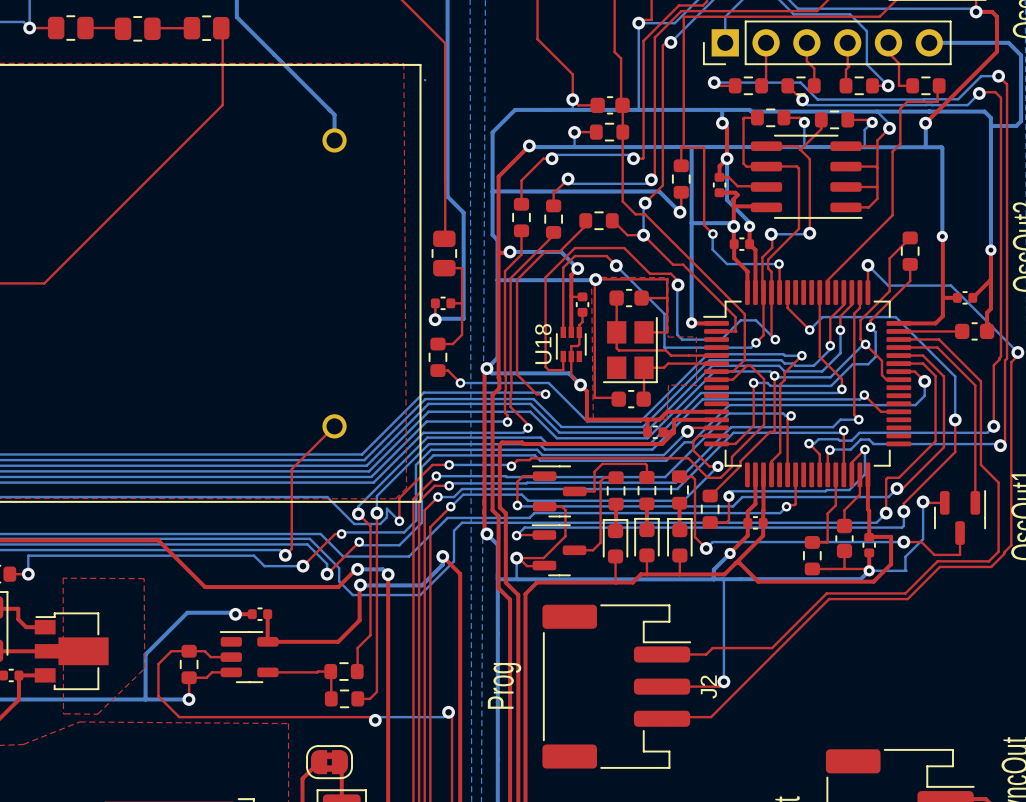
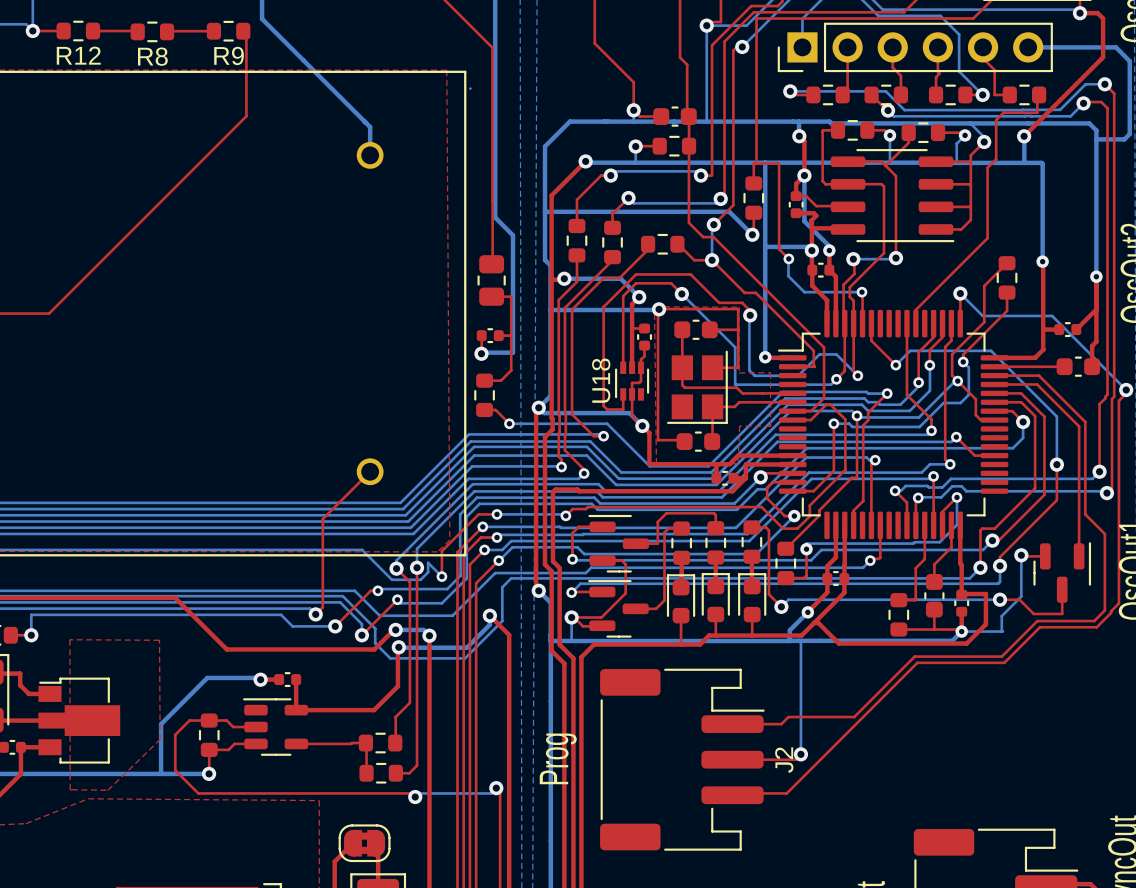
part: (70, 28) -> none
R12: none -> (78, 31)
part: (137, 28) -> none
R8: none -> (152, 31)
part: (206, 28) -> none
R9: none -> (228, 31)

